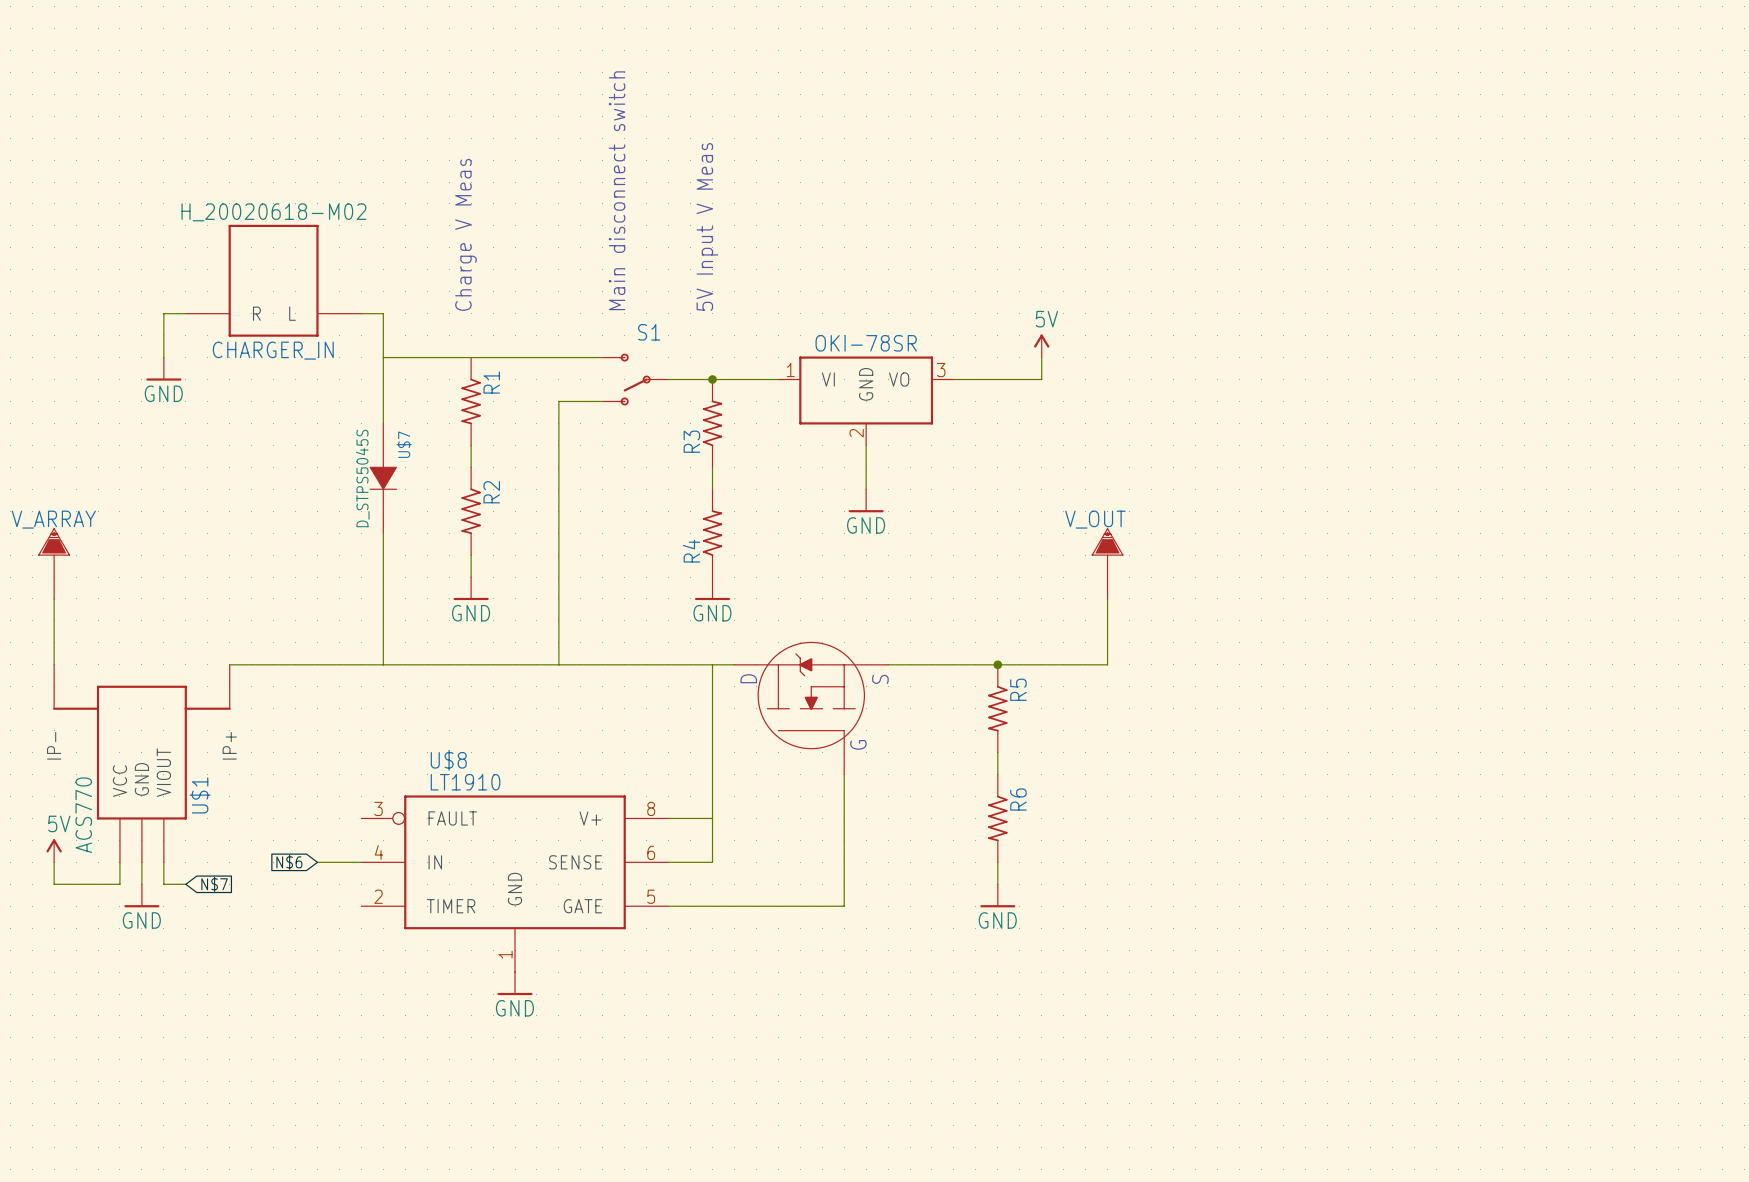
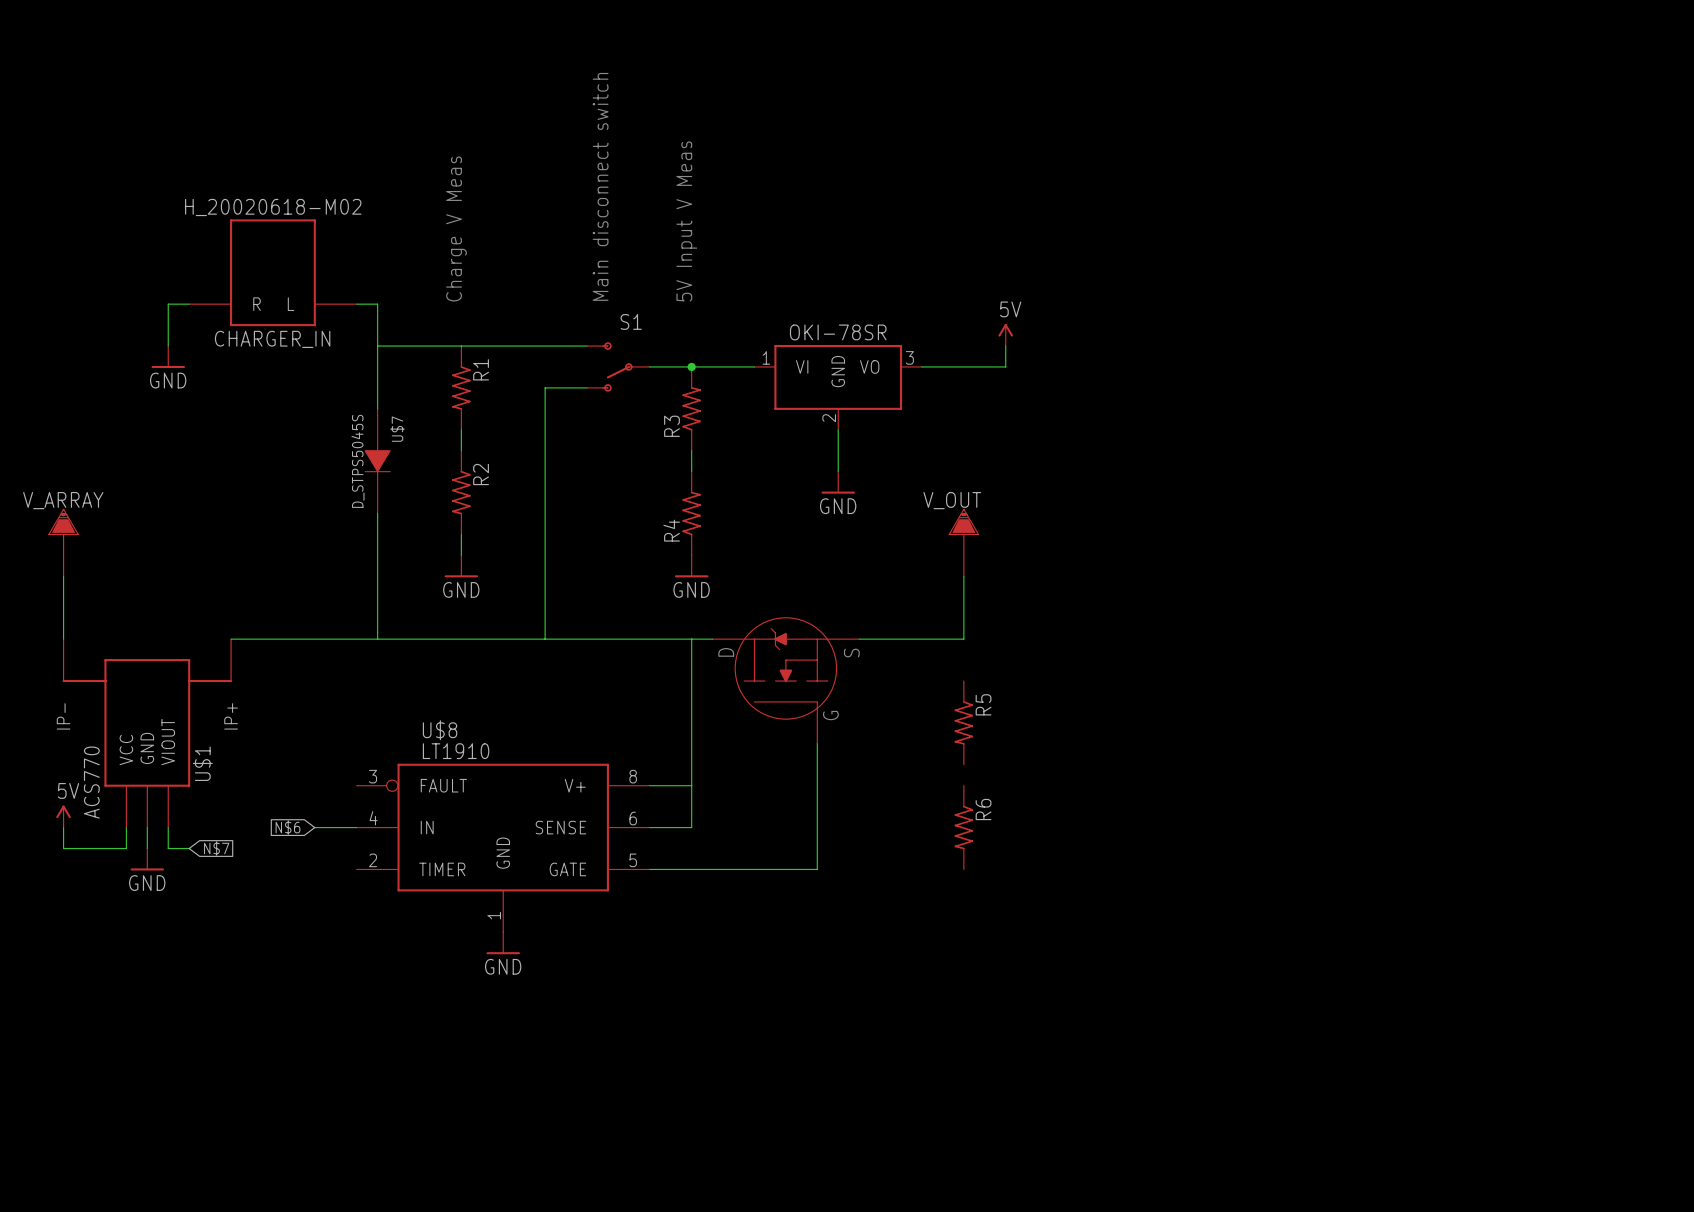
V_OUT position: (1107, 563) -> (963, 542)
wire: (1107, 598) (1107, 664) (997, 664) -> (963, 576) (963, 639)
junction: (997, 664) -> none
R5 position: (997, 708) -> (963, 722)
wire: (997, 752) (997, 774) -> none
R6 position: (997, 818) -> (963, 827)
wire: (997, 862) (997, 884) -> none
power symbol: GND (997, 895) -> none

